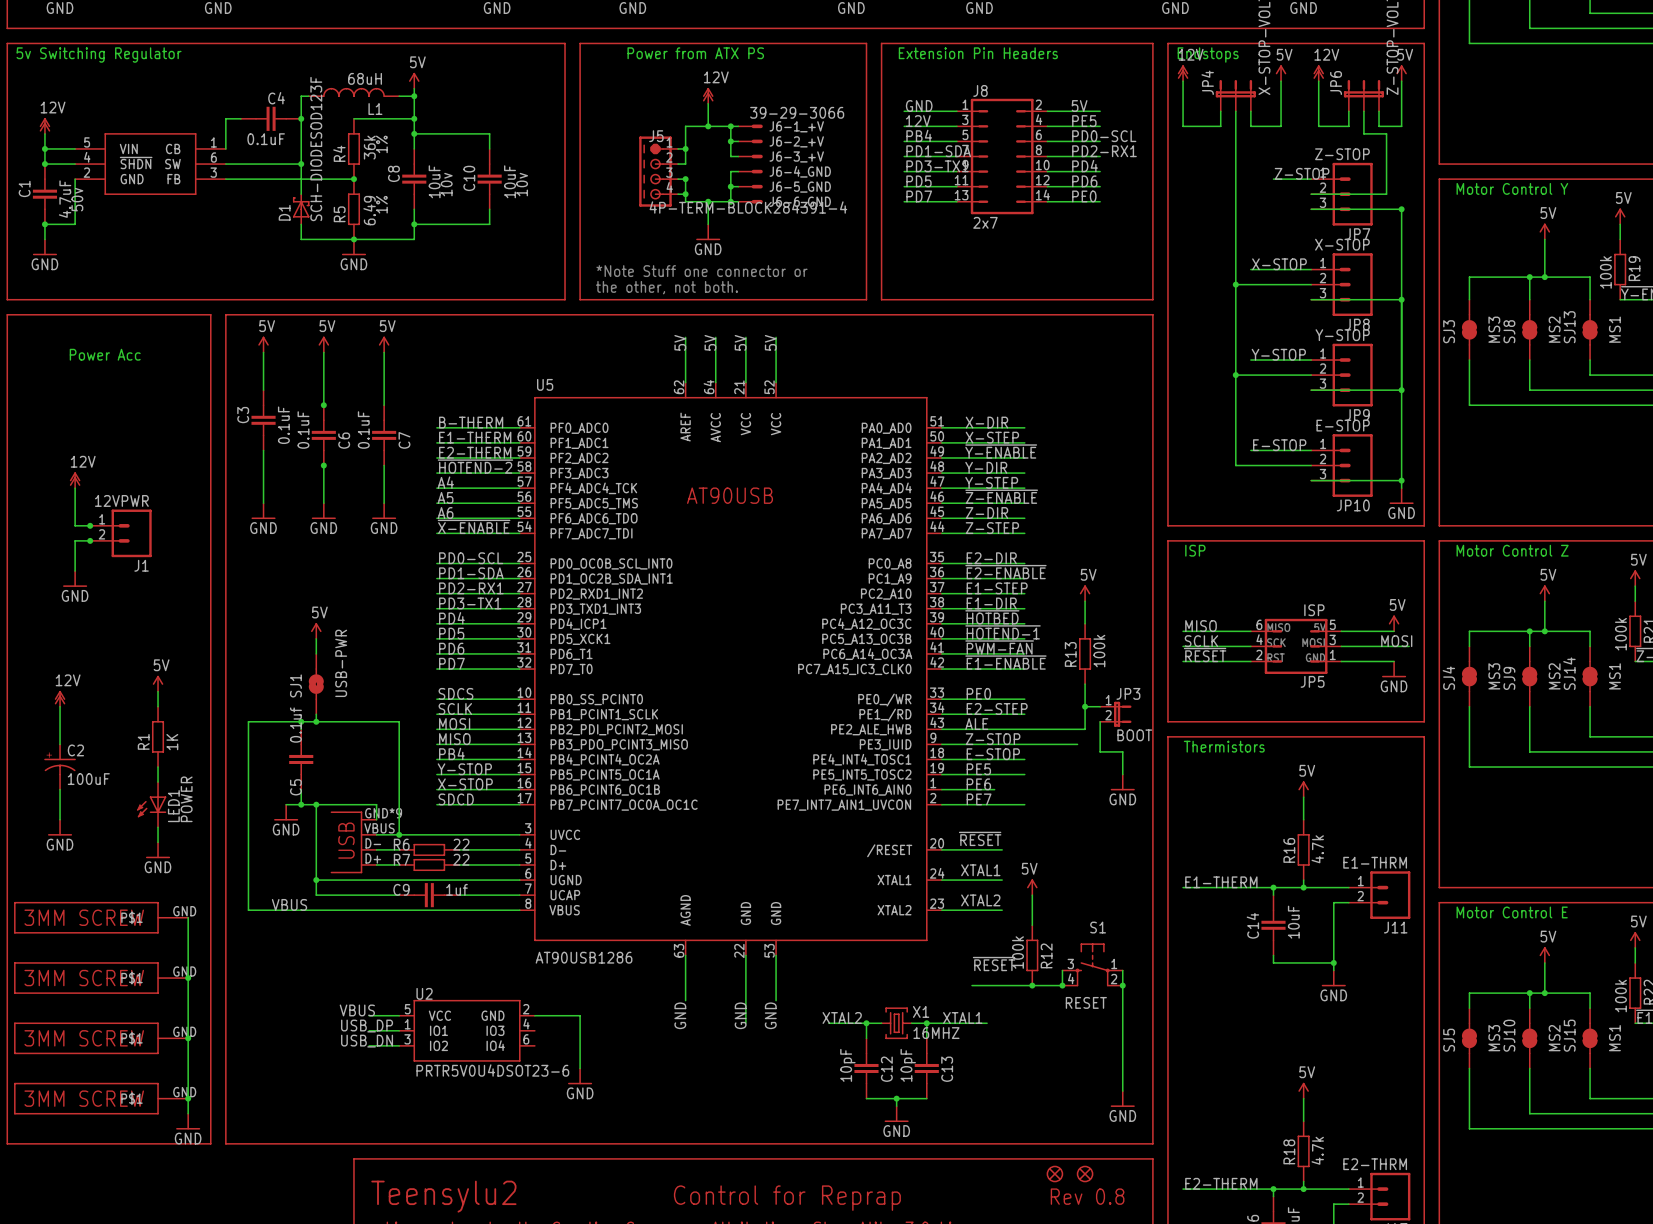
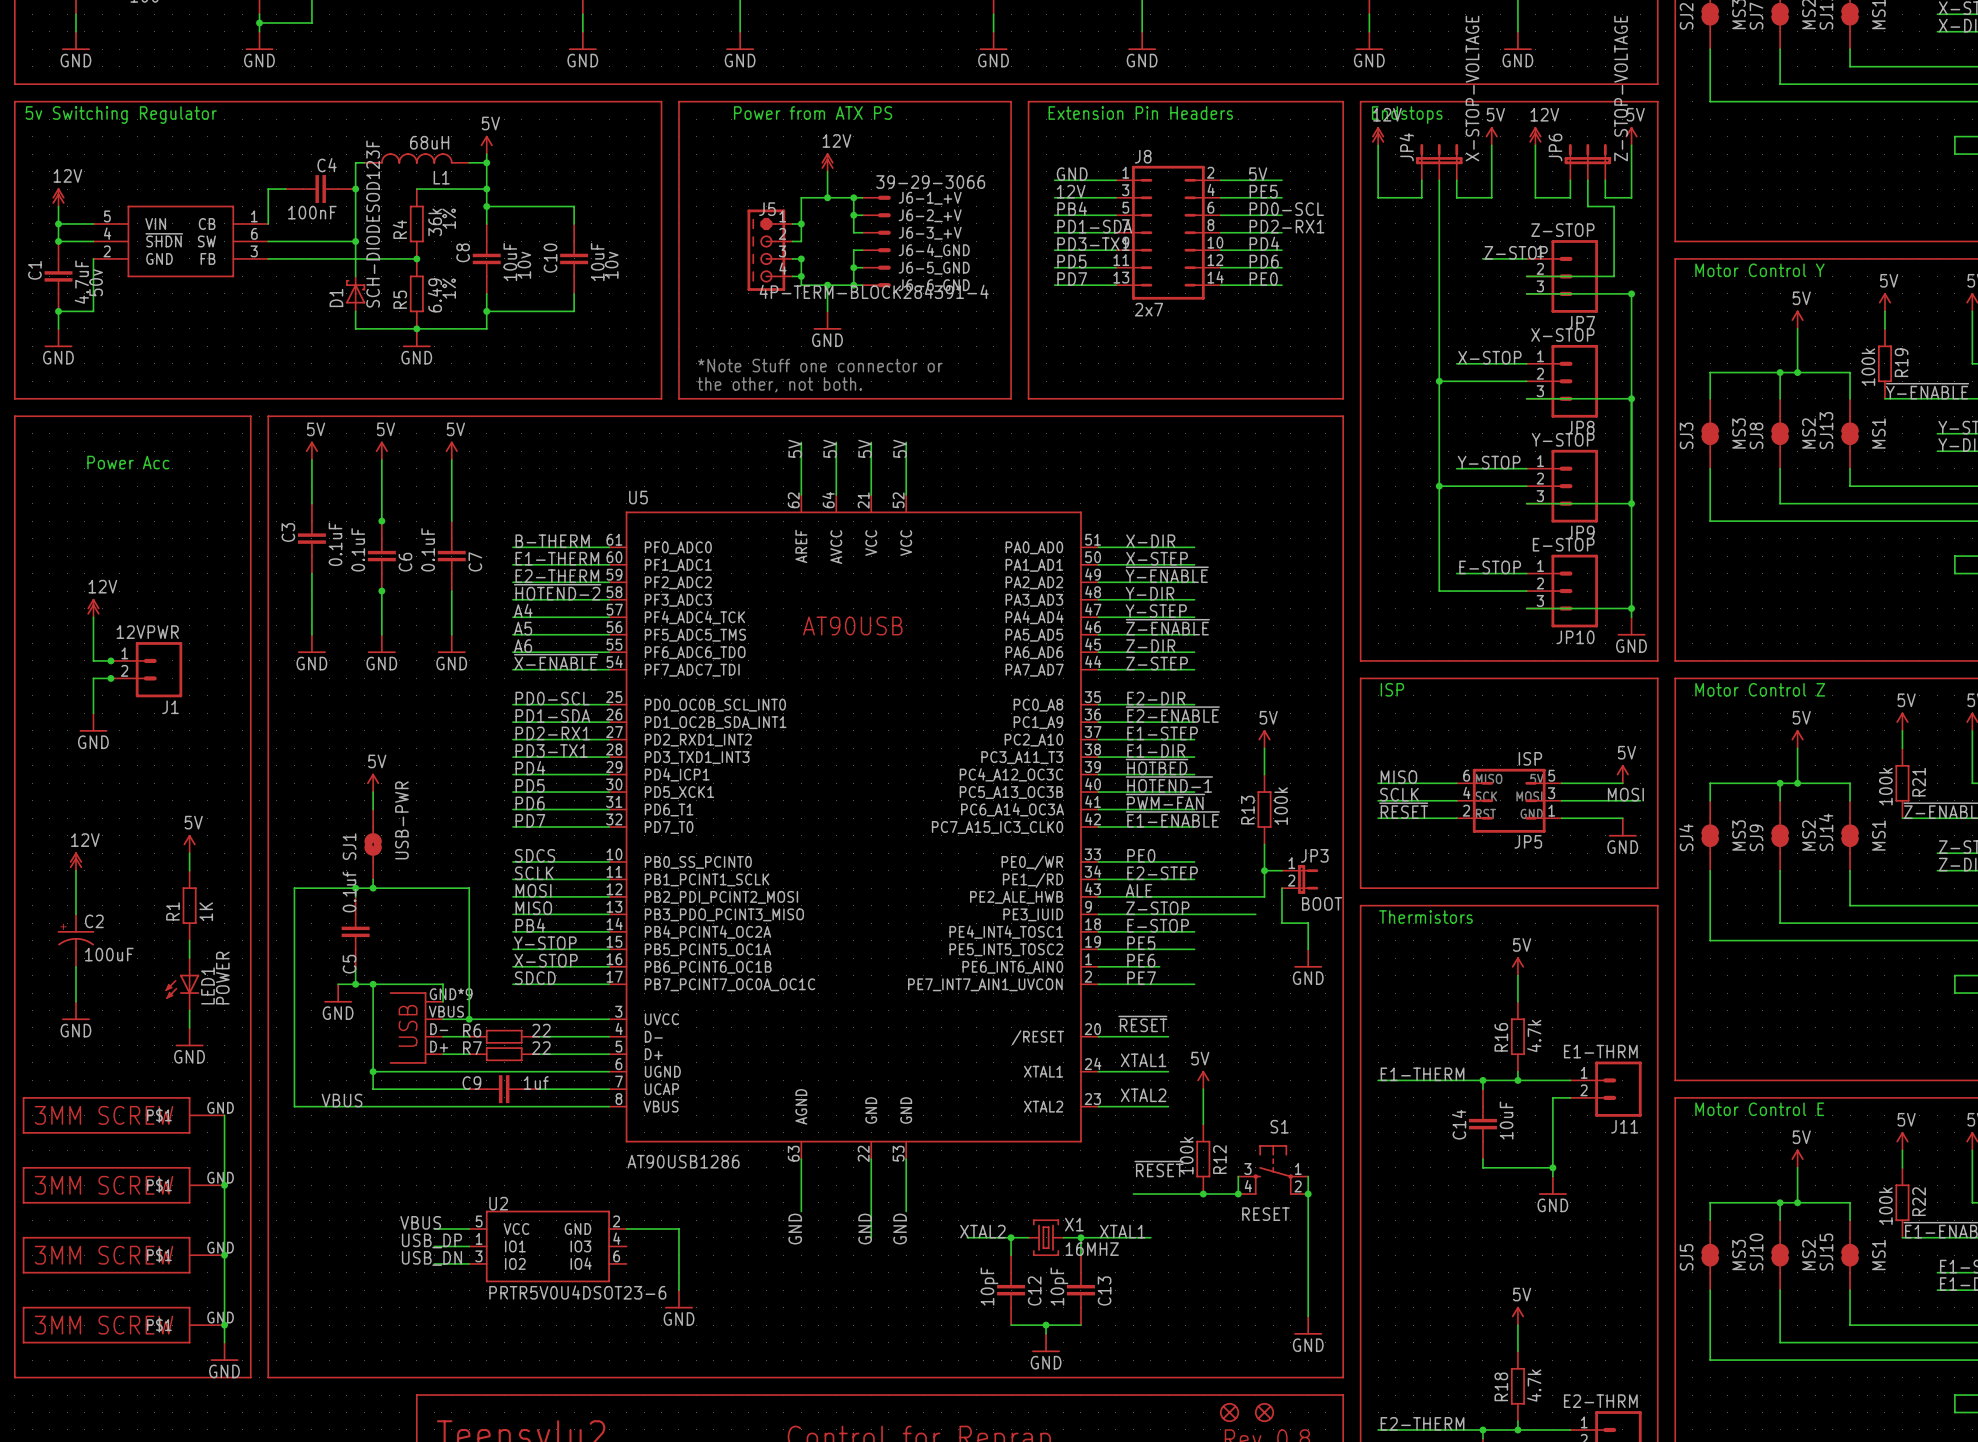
C4 value: 0.1uF (266, 139) -> 100nF (312, 212)

